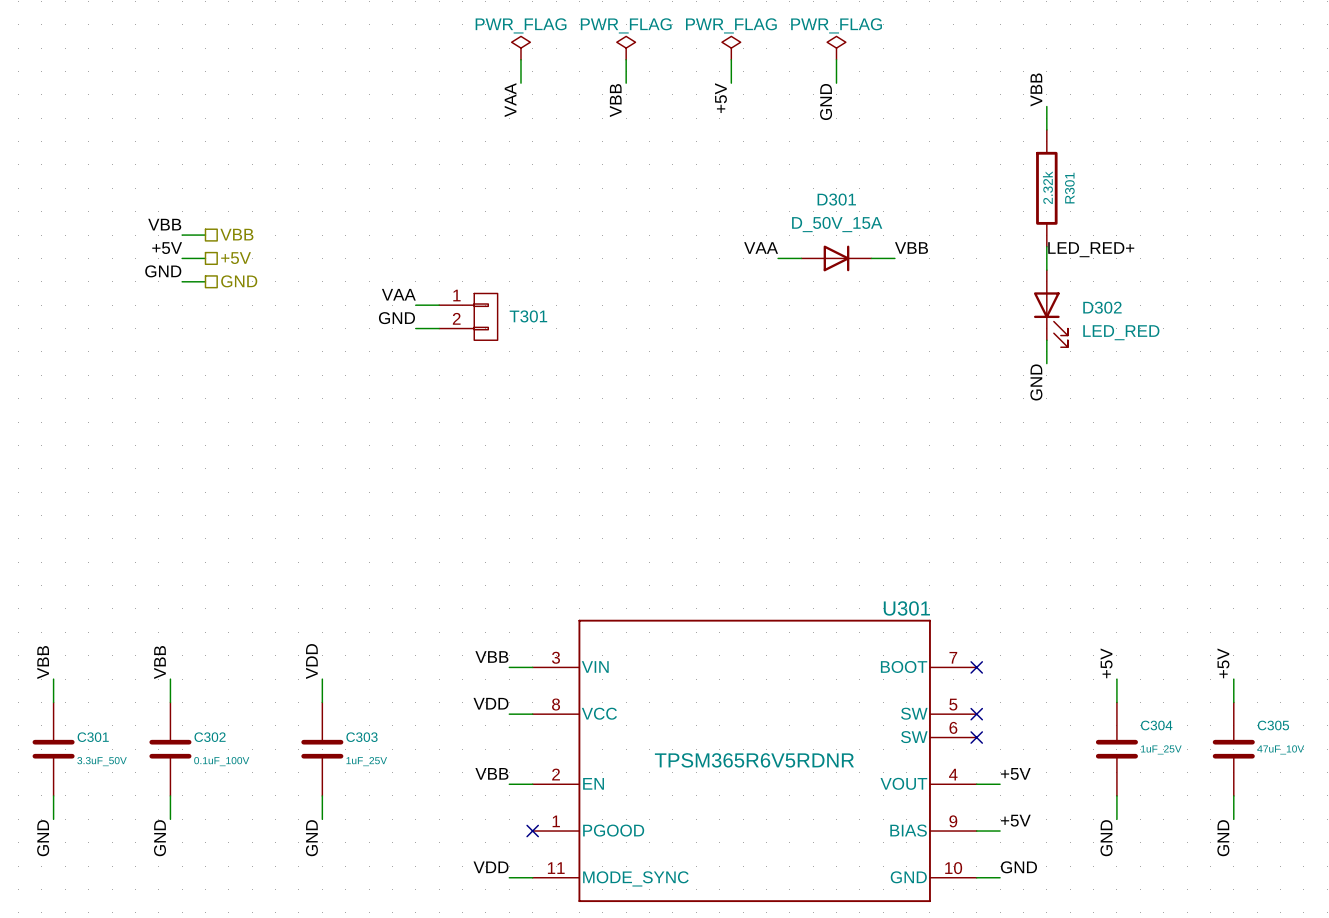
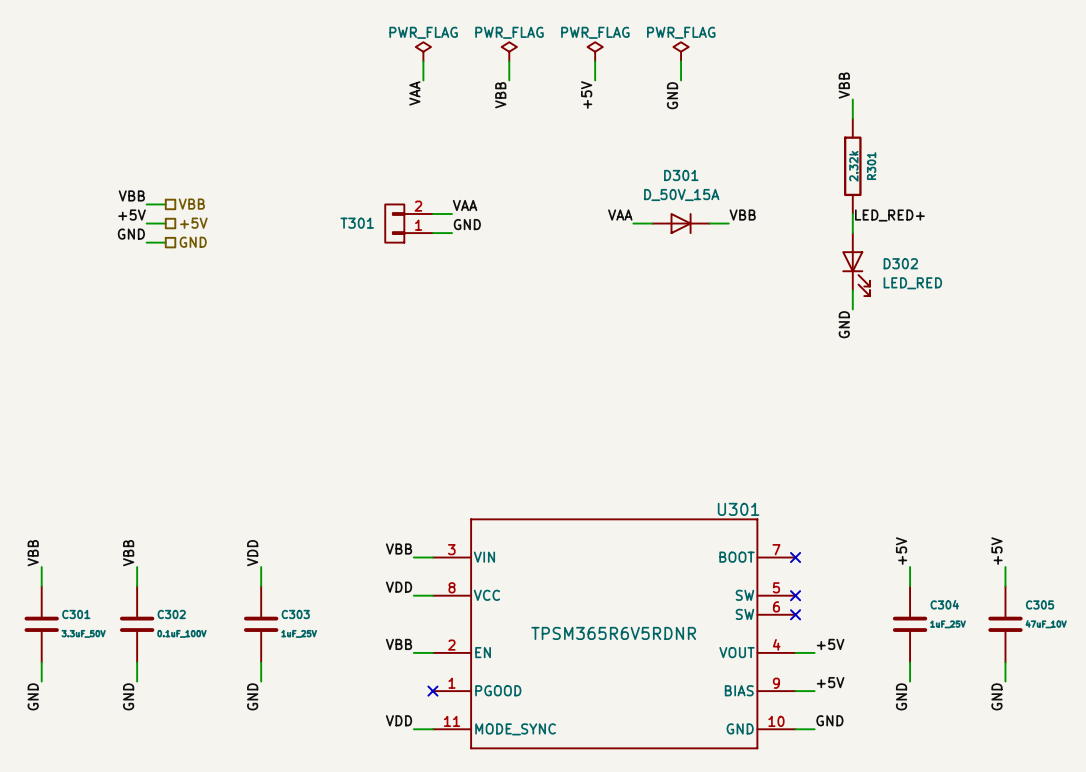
label position: VAA (398, 294) -> VAA (465, 205)
wire: (415, 305) (439, 305) -> (432, 213) (452, 213)
T301 position: (468, 316) -> (409, 223)
T301 rotation: 0° (485, 316) -> 180° (394, 223)
label position: GND (396, 318) -> GND (467, 224)
wire: (415, 328) (439, 328) -> (432, 233) (452, 233)

